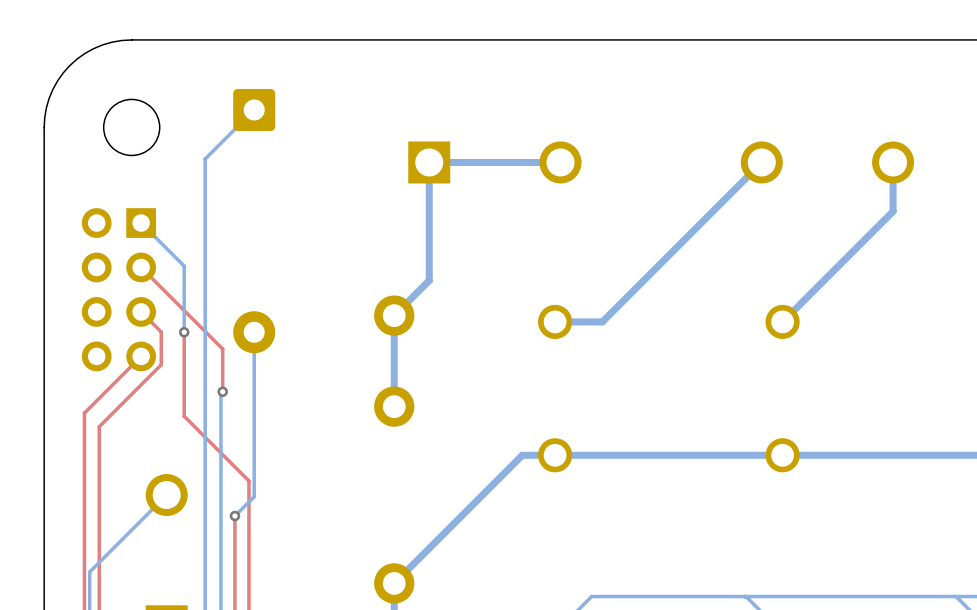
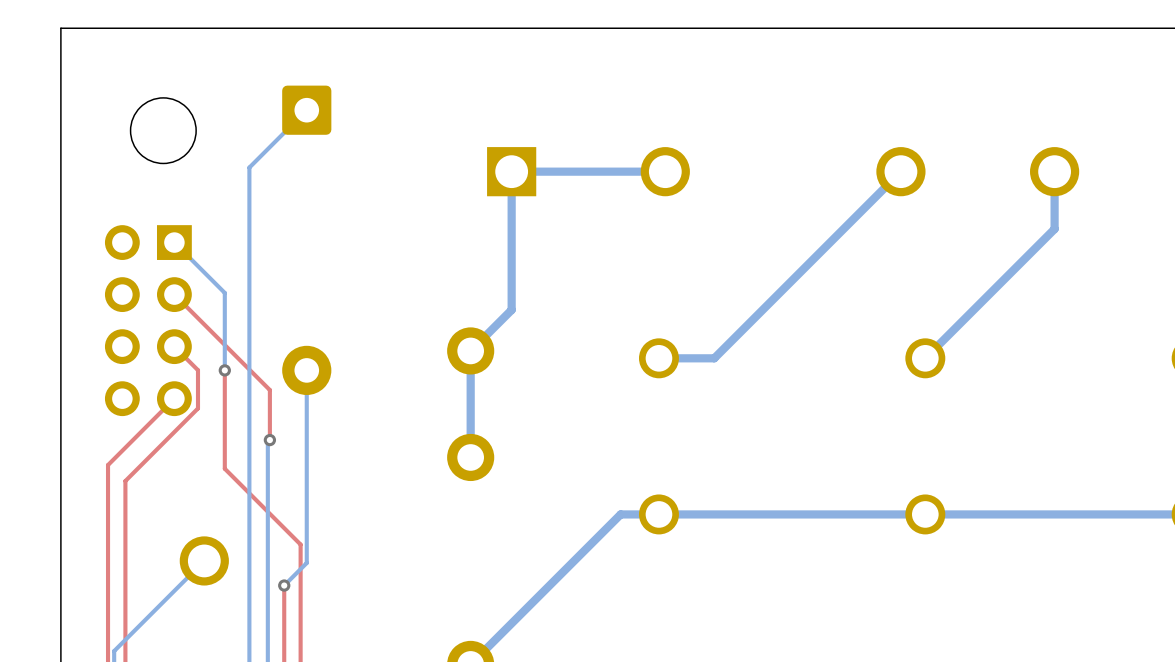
board edge: (131, 39) (102, 44) (85, 53) (69, 65) (52, 89) (46, 107) (44, 127) -> (163, 28) (60, 28) (60, 130)

